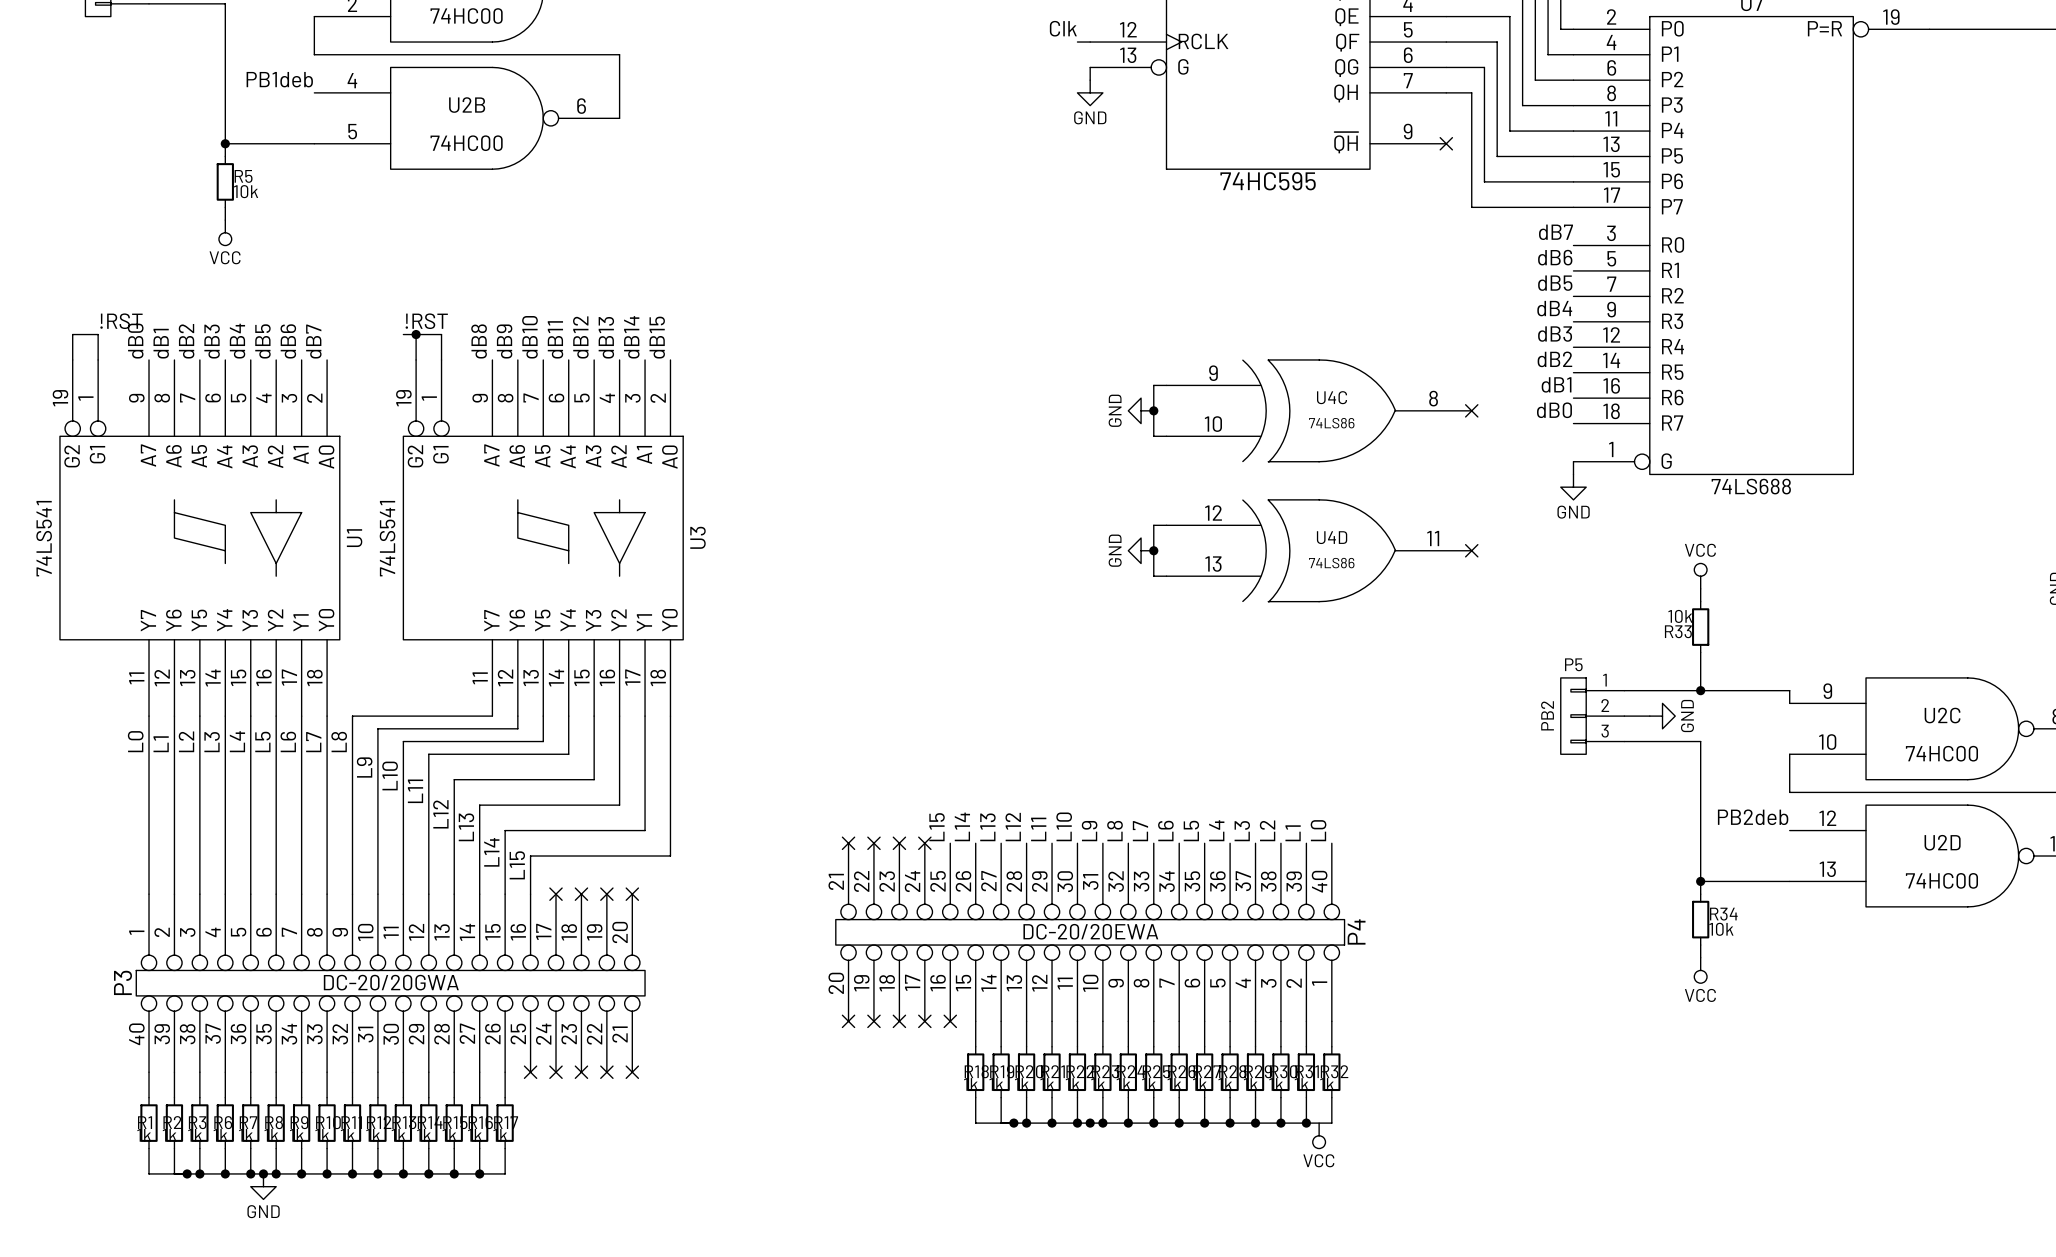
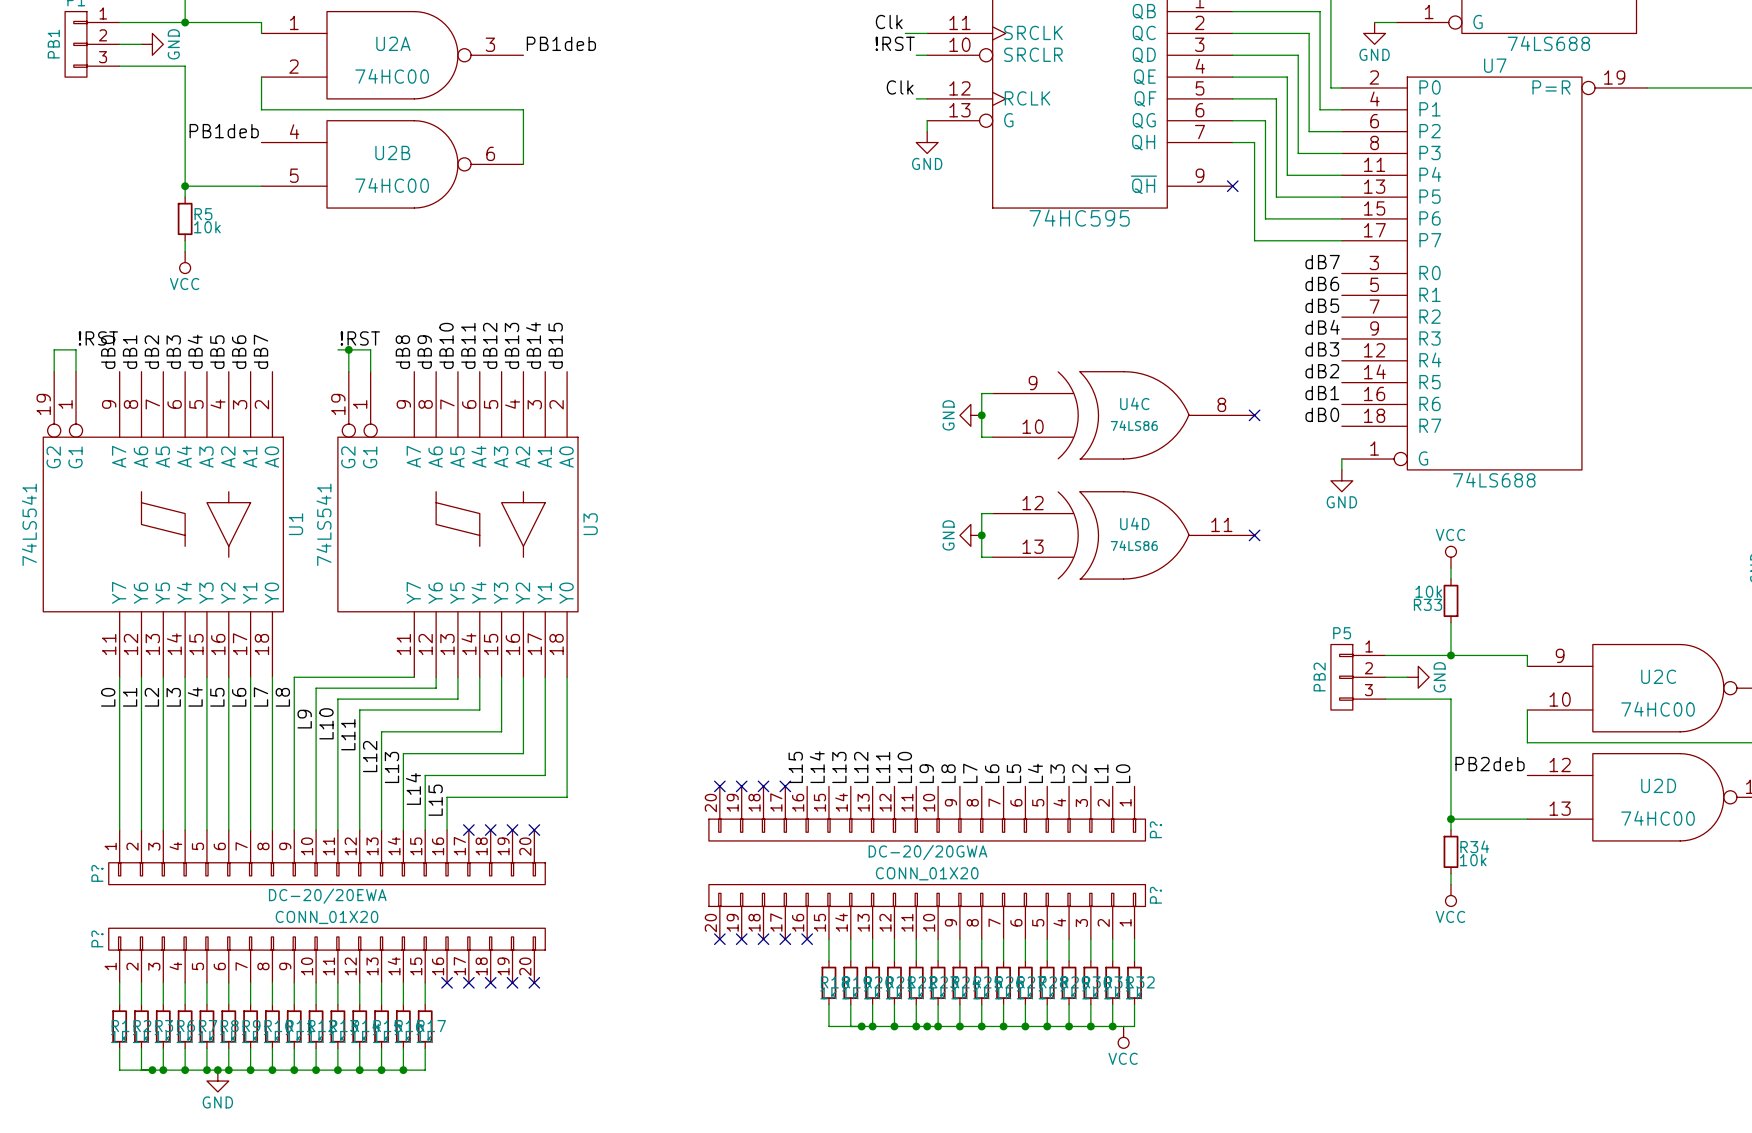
P?: none -> DC-20/20GWA (927, 813)
P?: none -> DC-20/20EWA (327, 857)
P4: DC-20/20EWA (1090, 932) -> none
P3: DC-20/20GWA (390, 983) -> none
P?: none -> CONN_01X20 (927, 911)
P?: none -> CONN_01X20 (327, 955)

